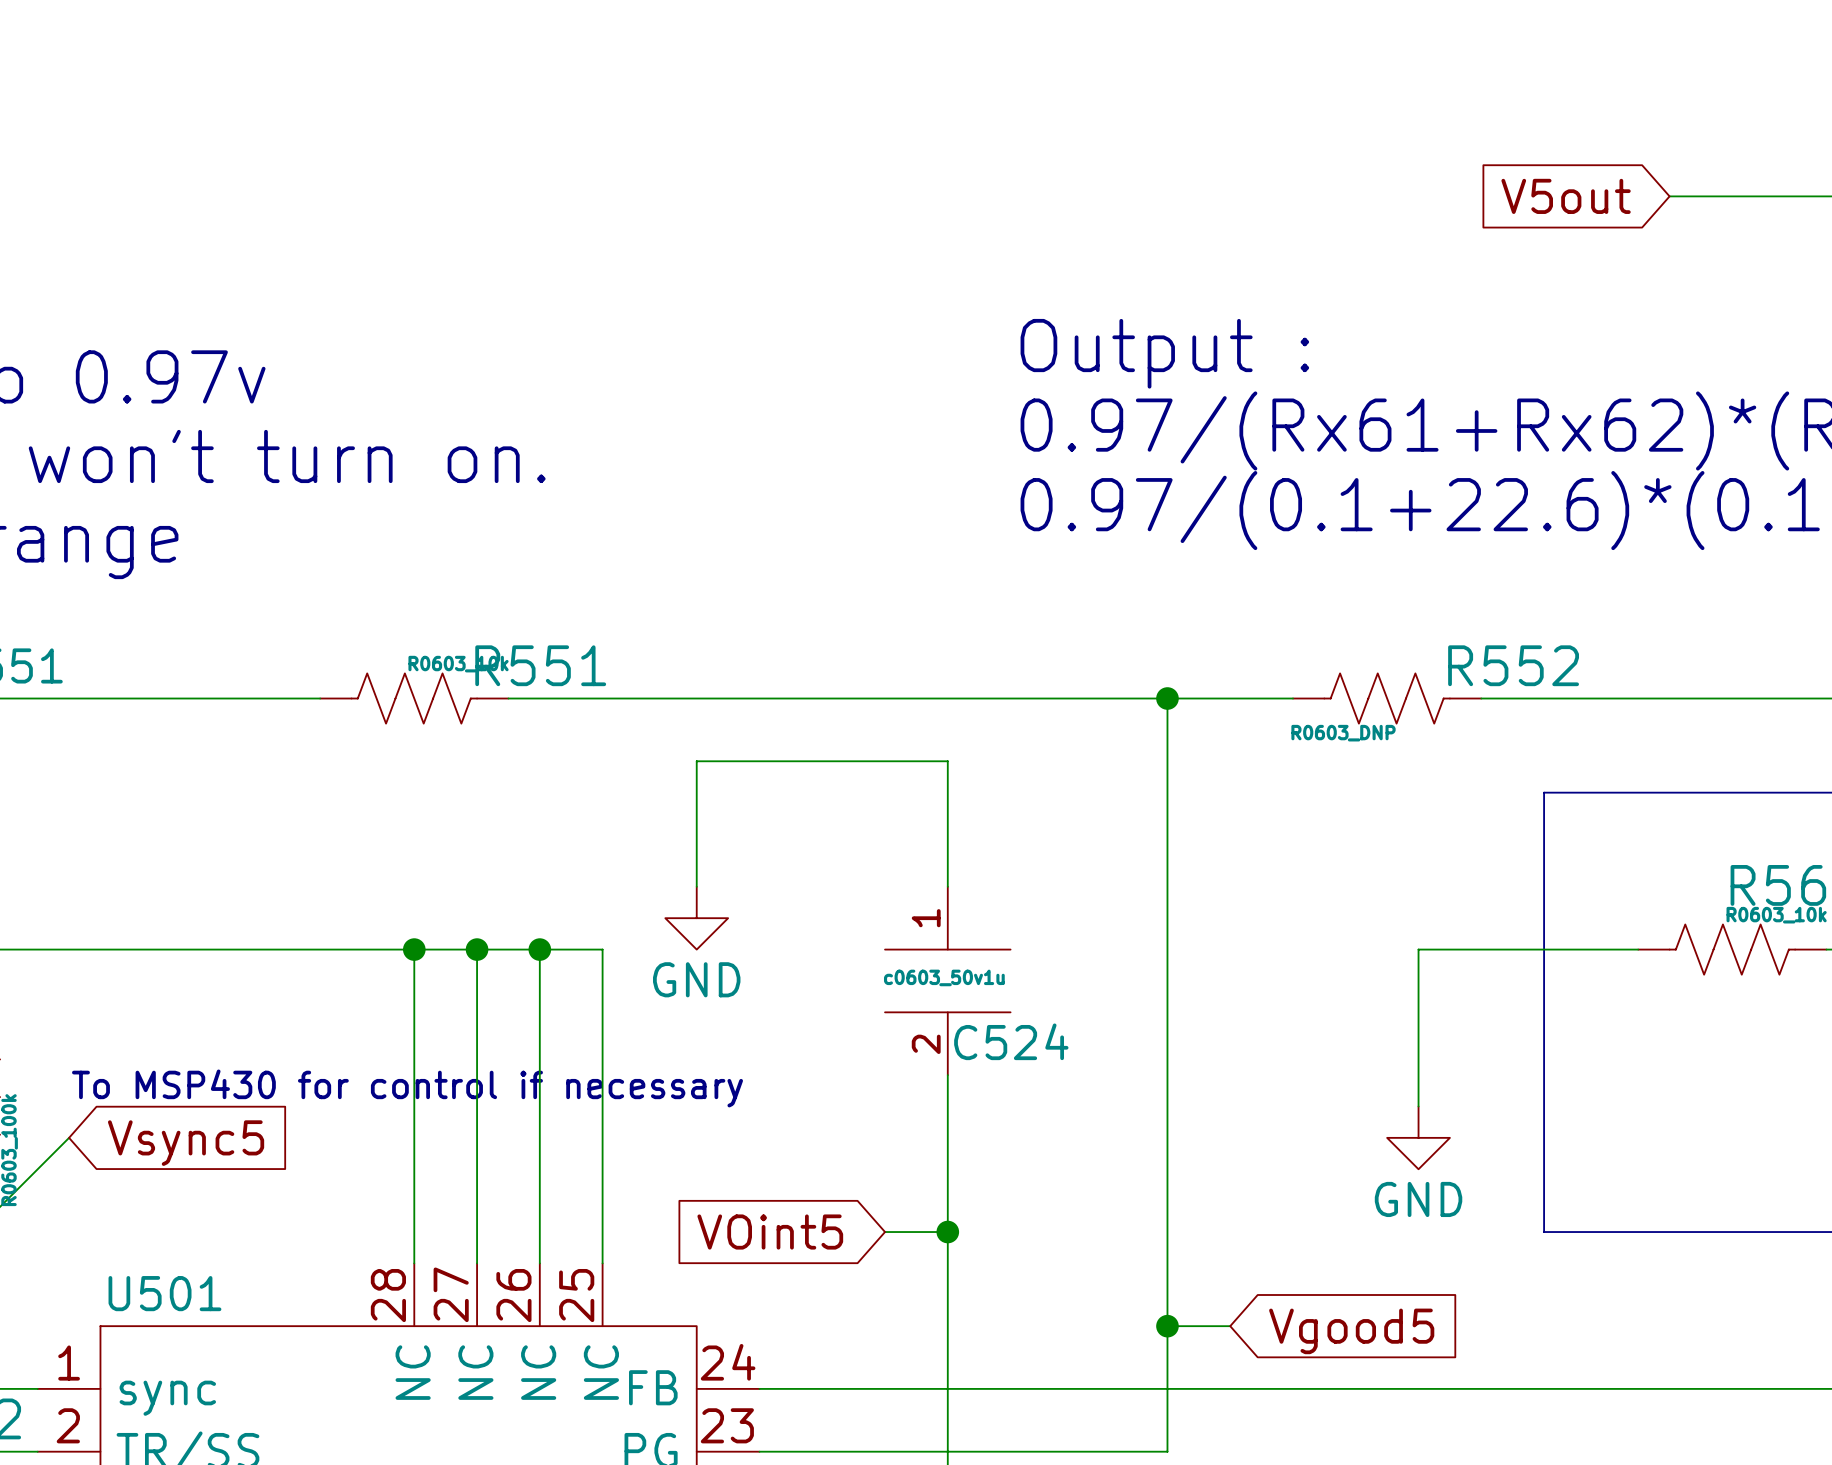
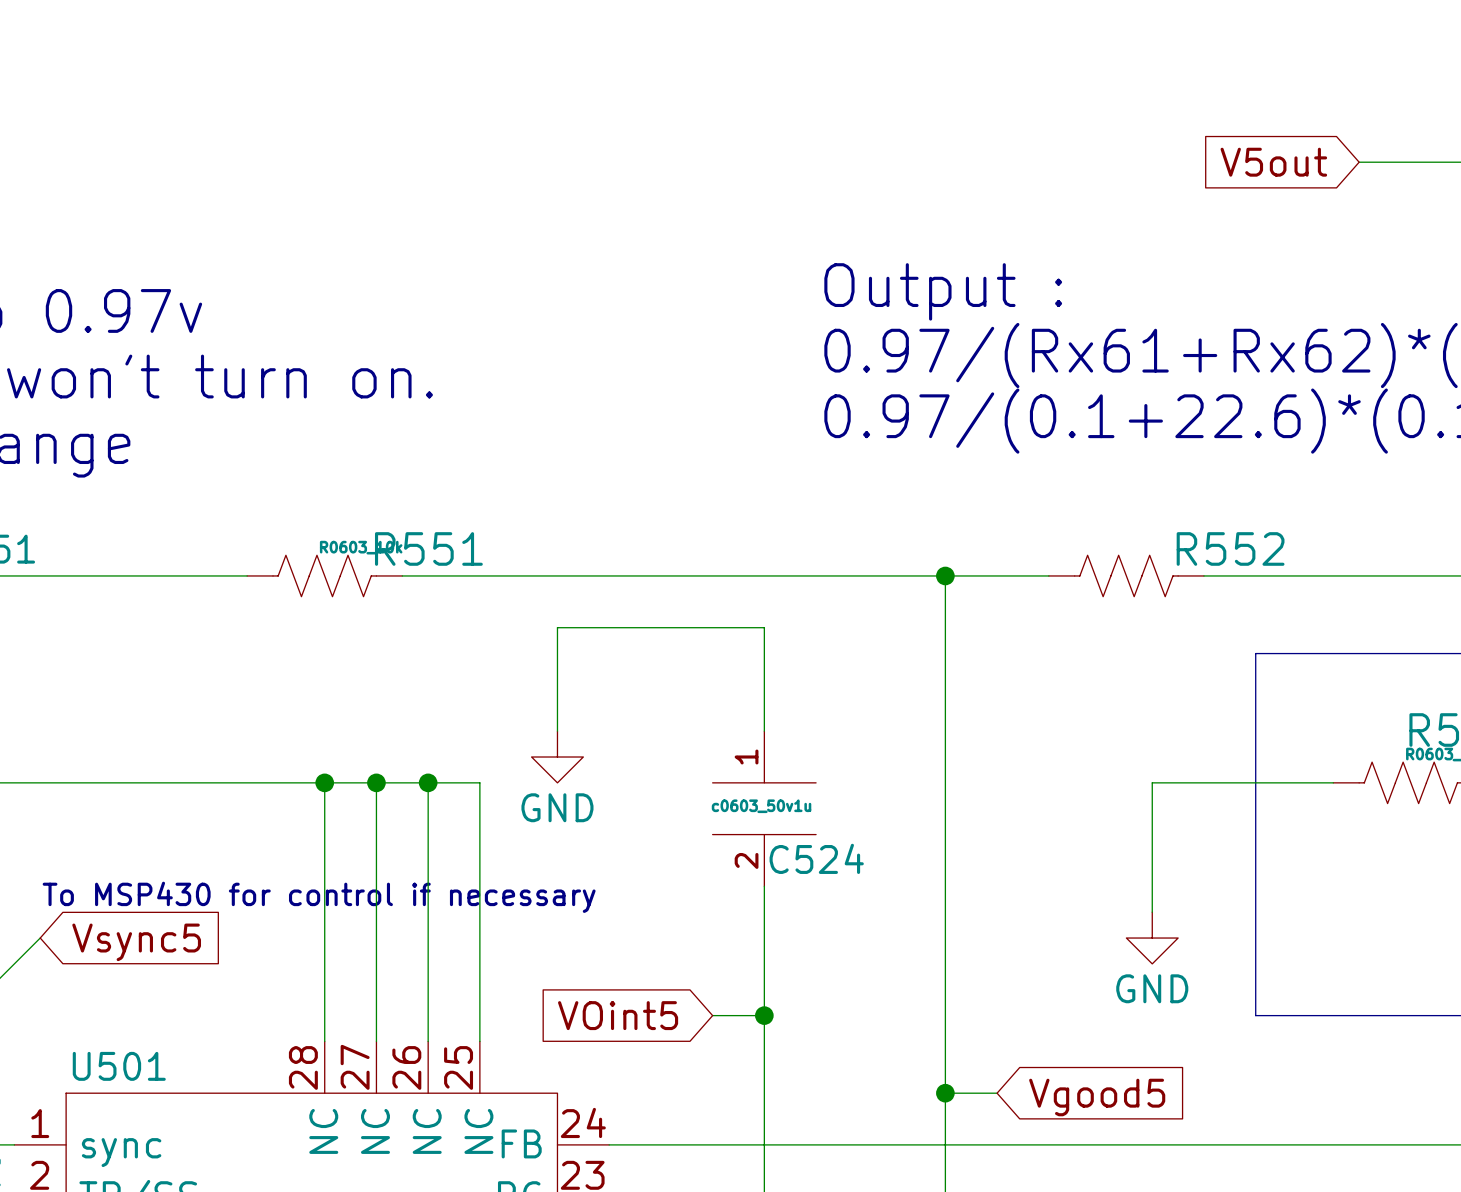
R552 value: R0603_DNP (1343, 733) -> none

